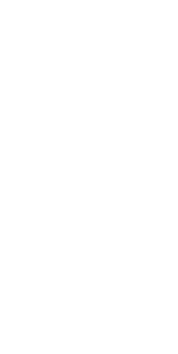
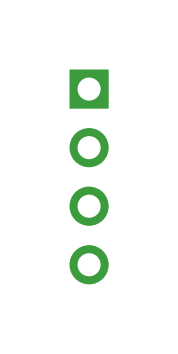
part: none -> (89, 176)

